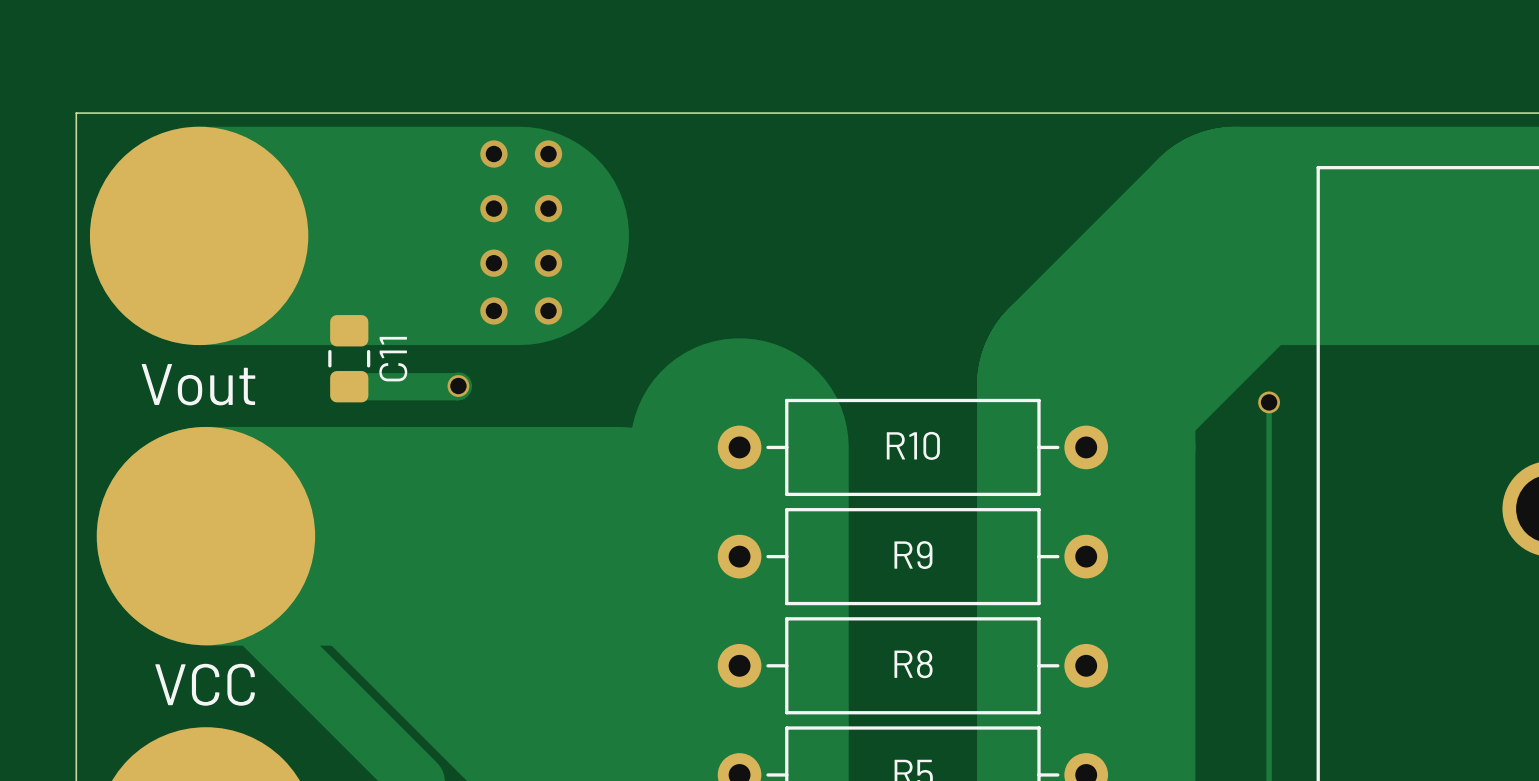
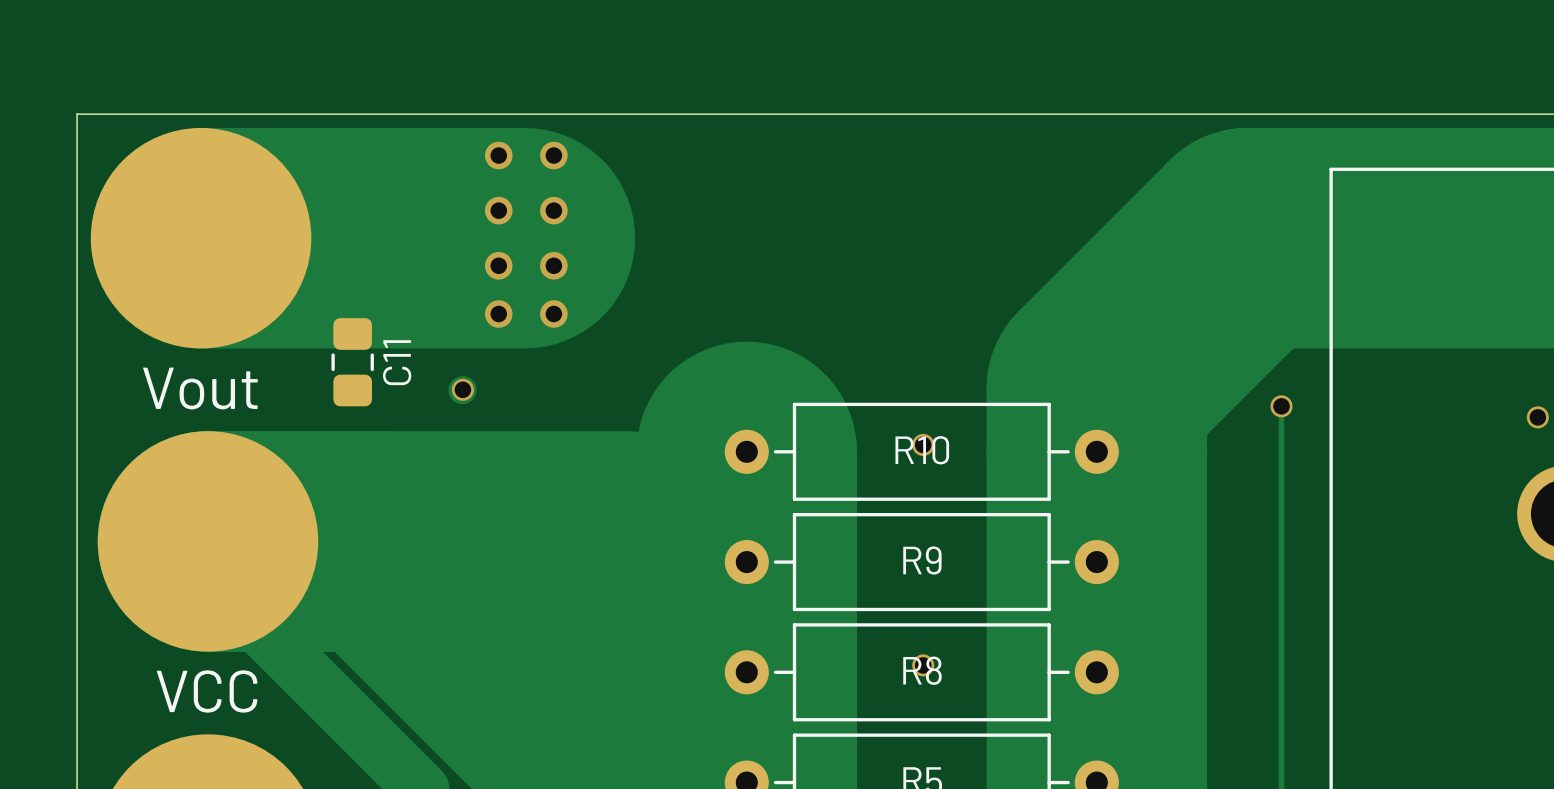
track: (349, 386) (457, 386) -> none
via: none -> (1537, 417)
via: none -> (923, 444)
via: none -> (923, 665)

